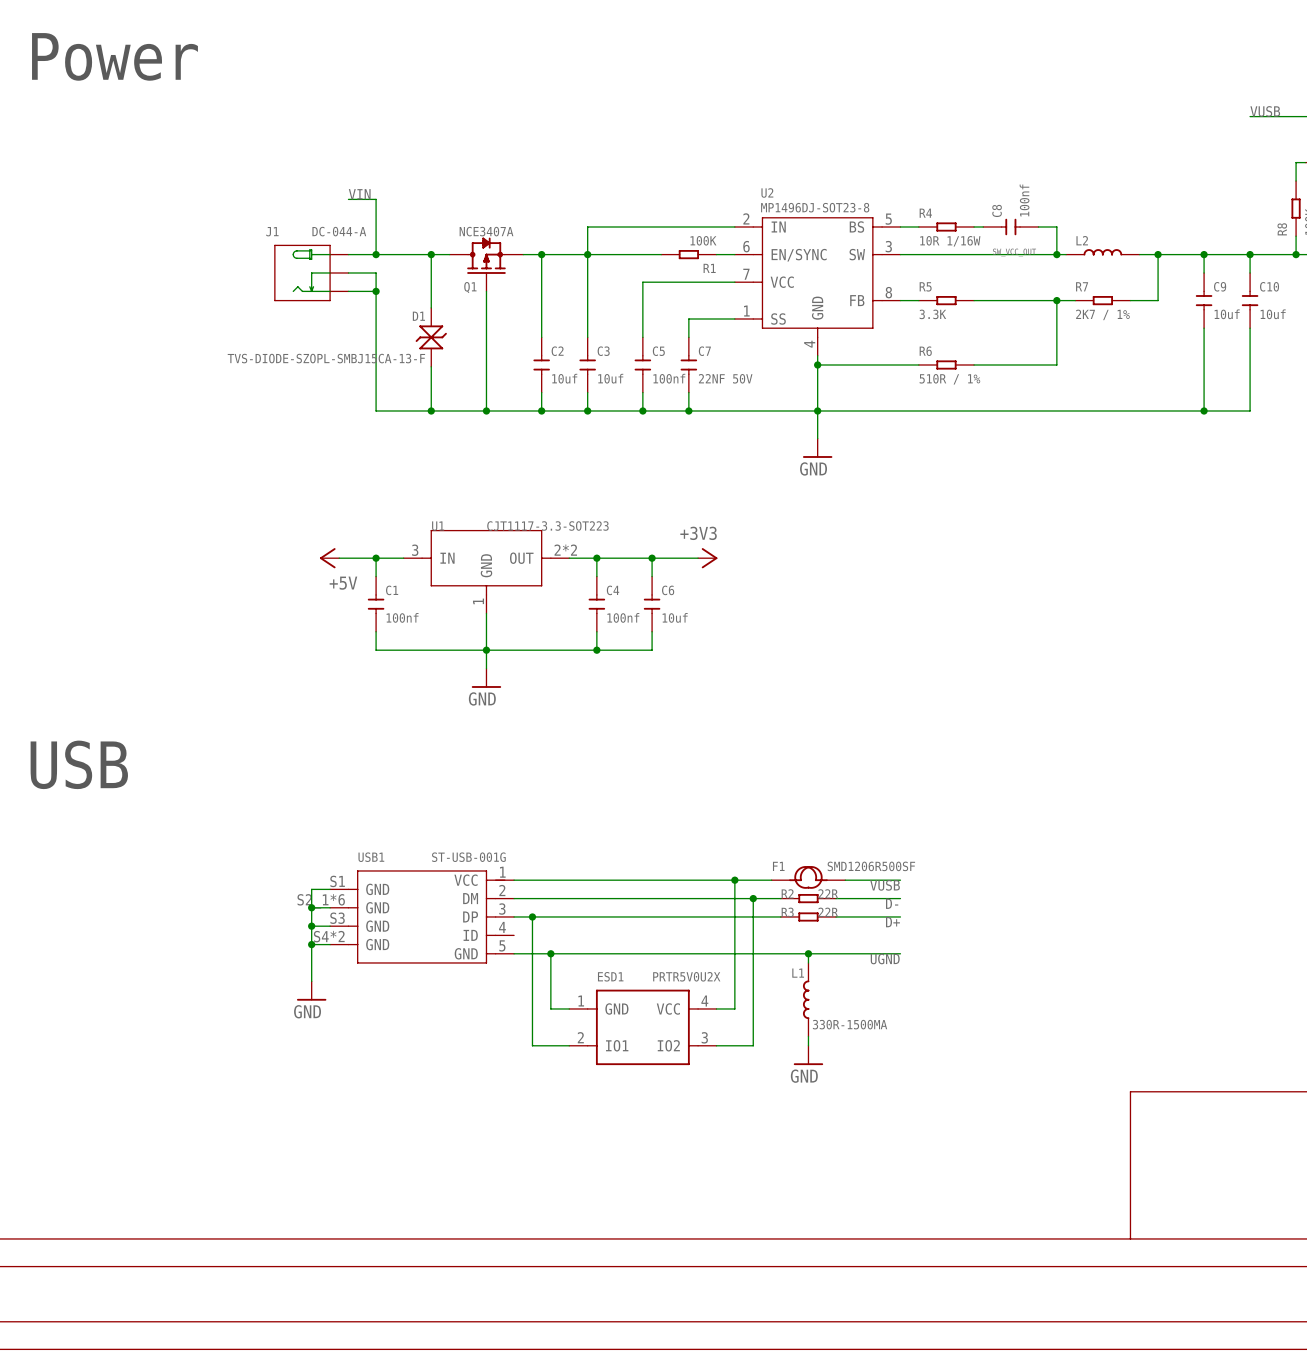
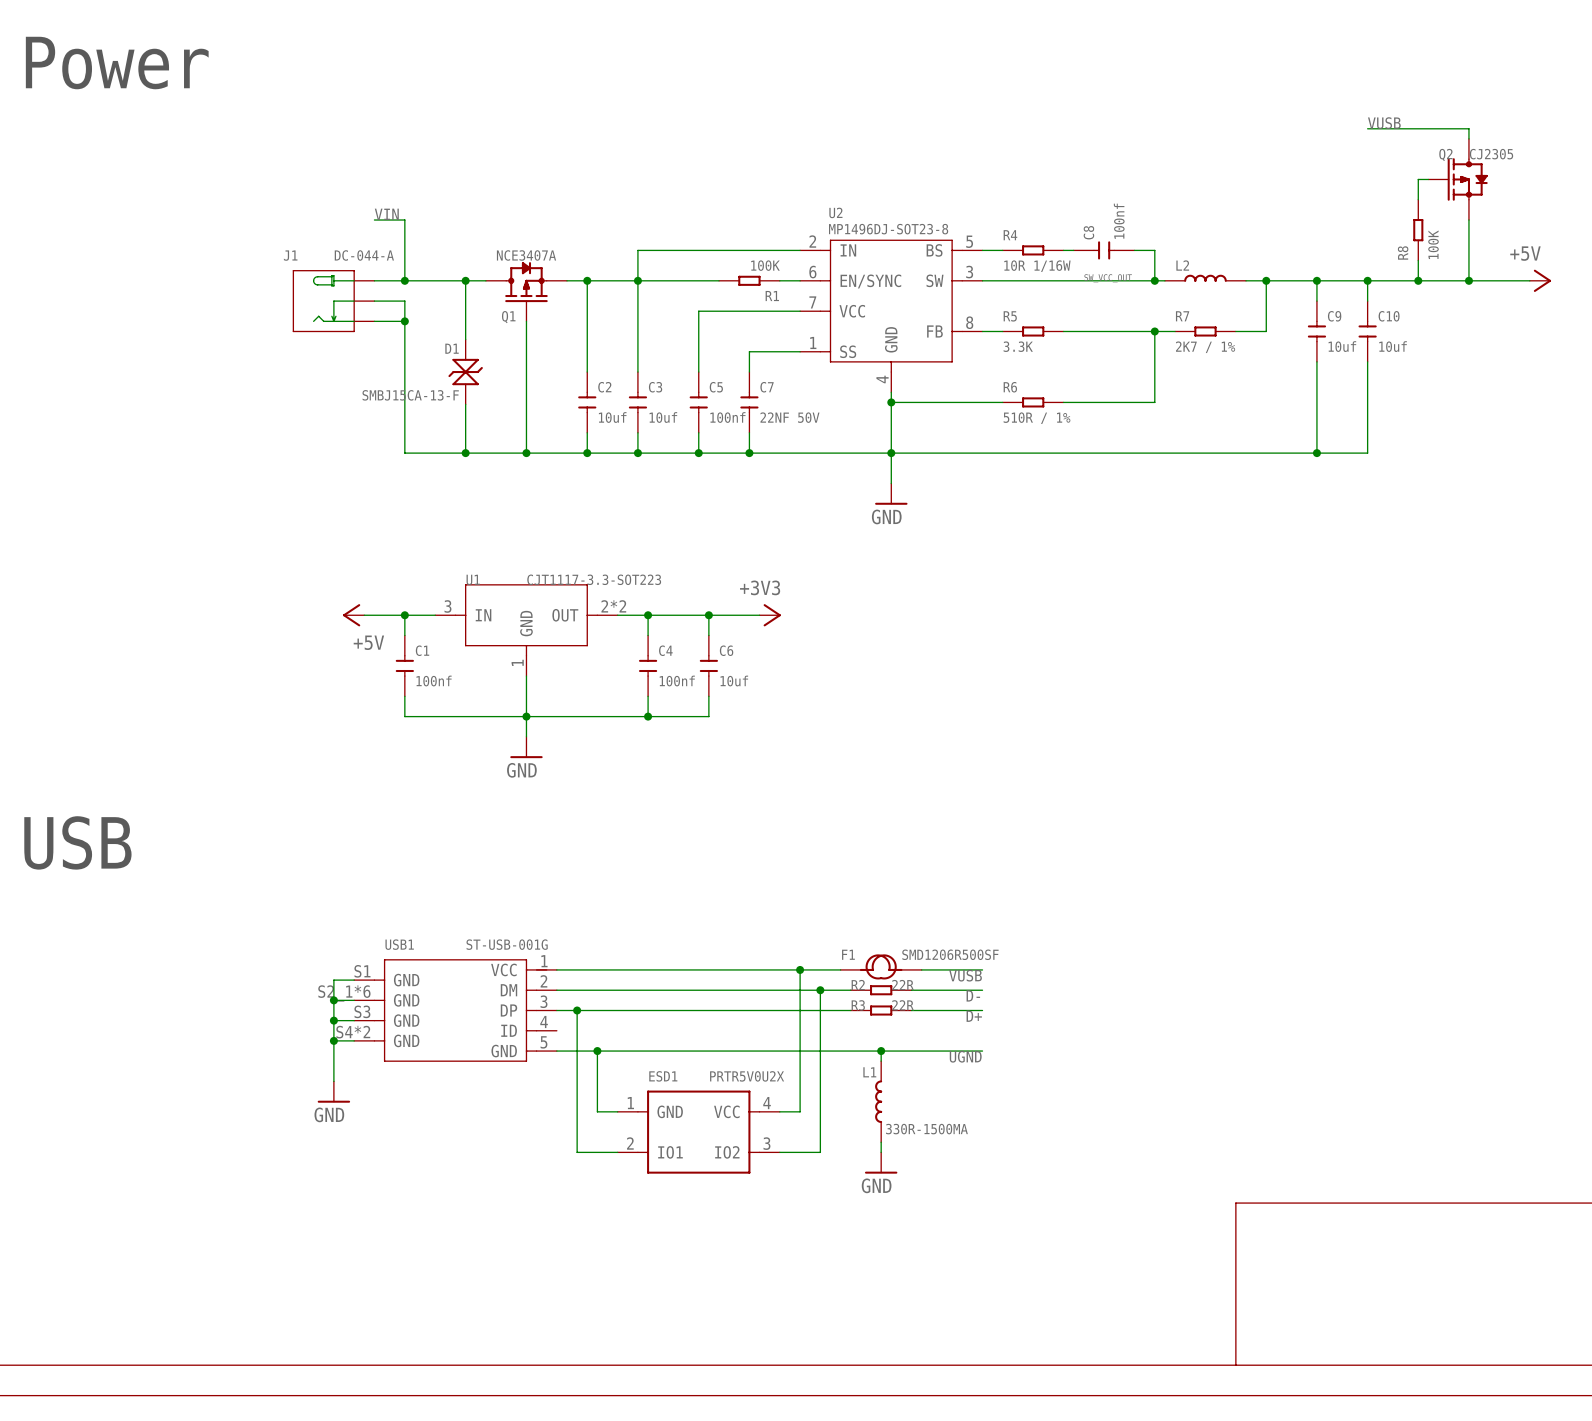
D1 value: TVS-DIODE-SZOPL-SMBJ15CA-13-F (326, 358) -> SMBJ15CA-13-F (410, 395)

